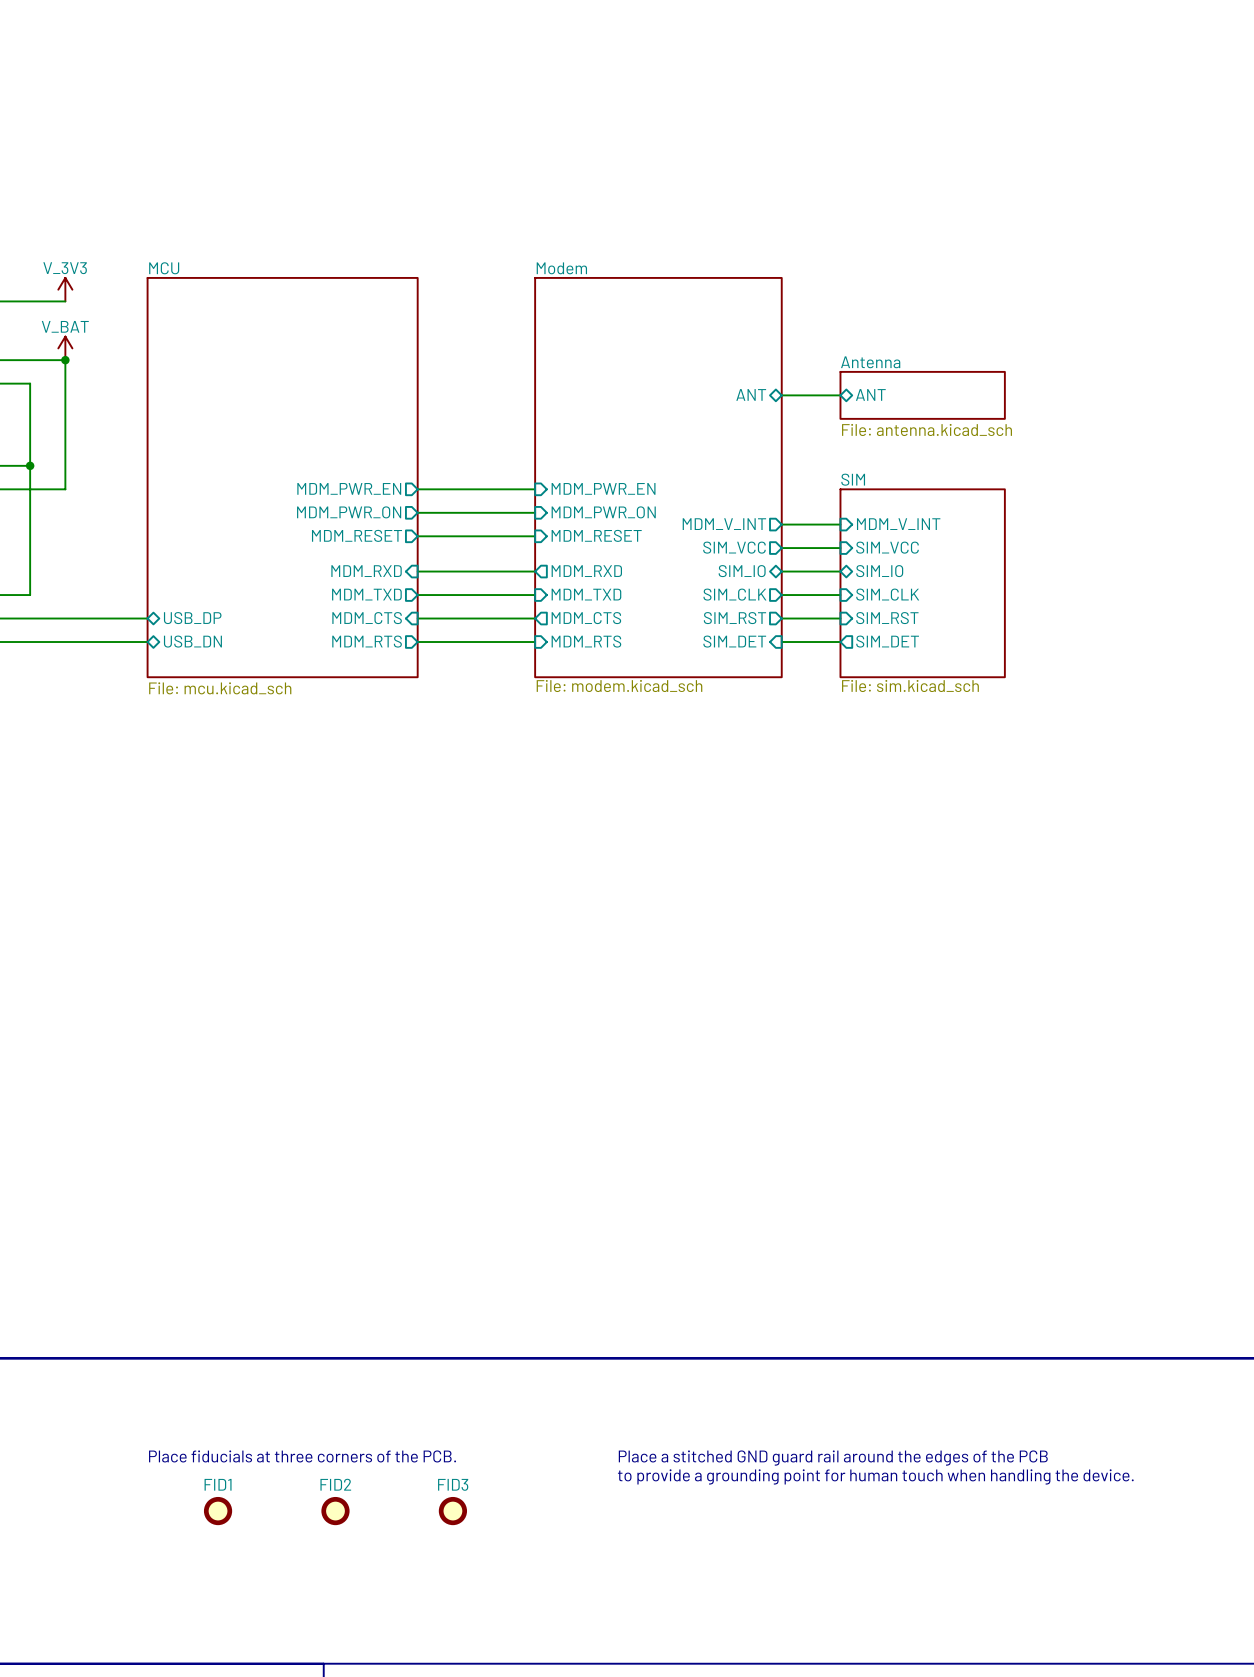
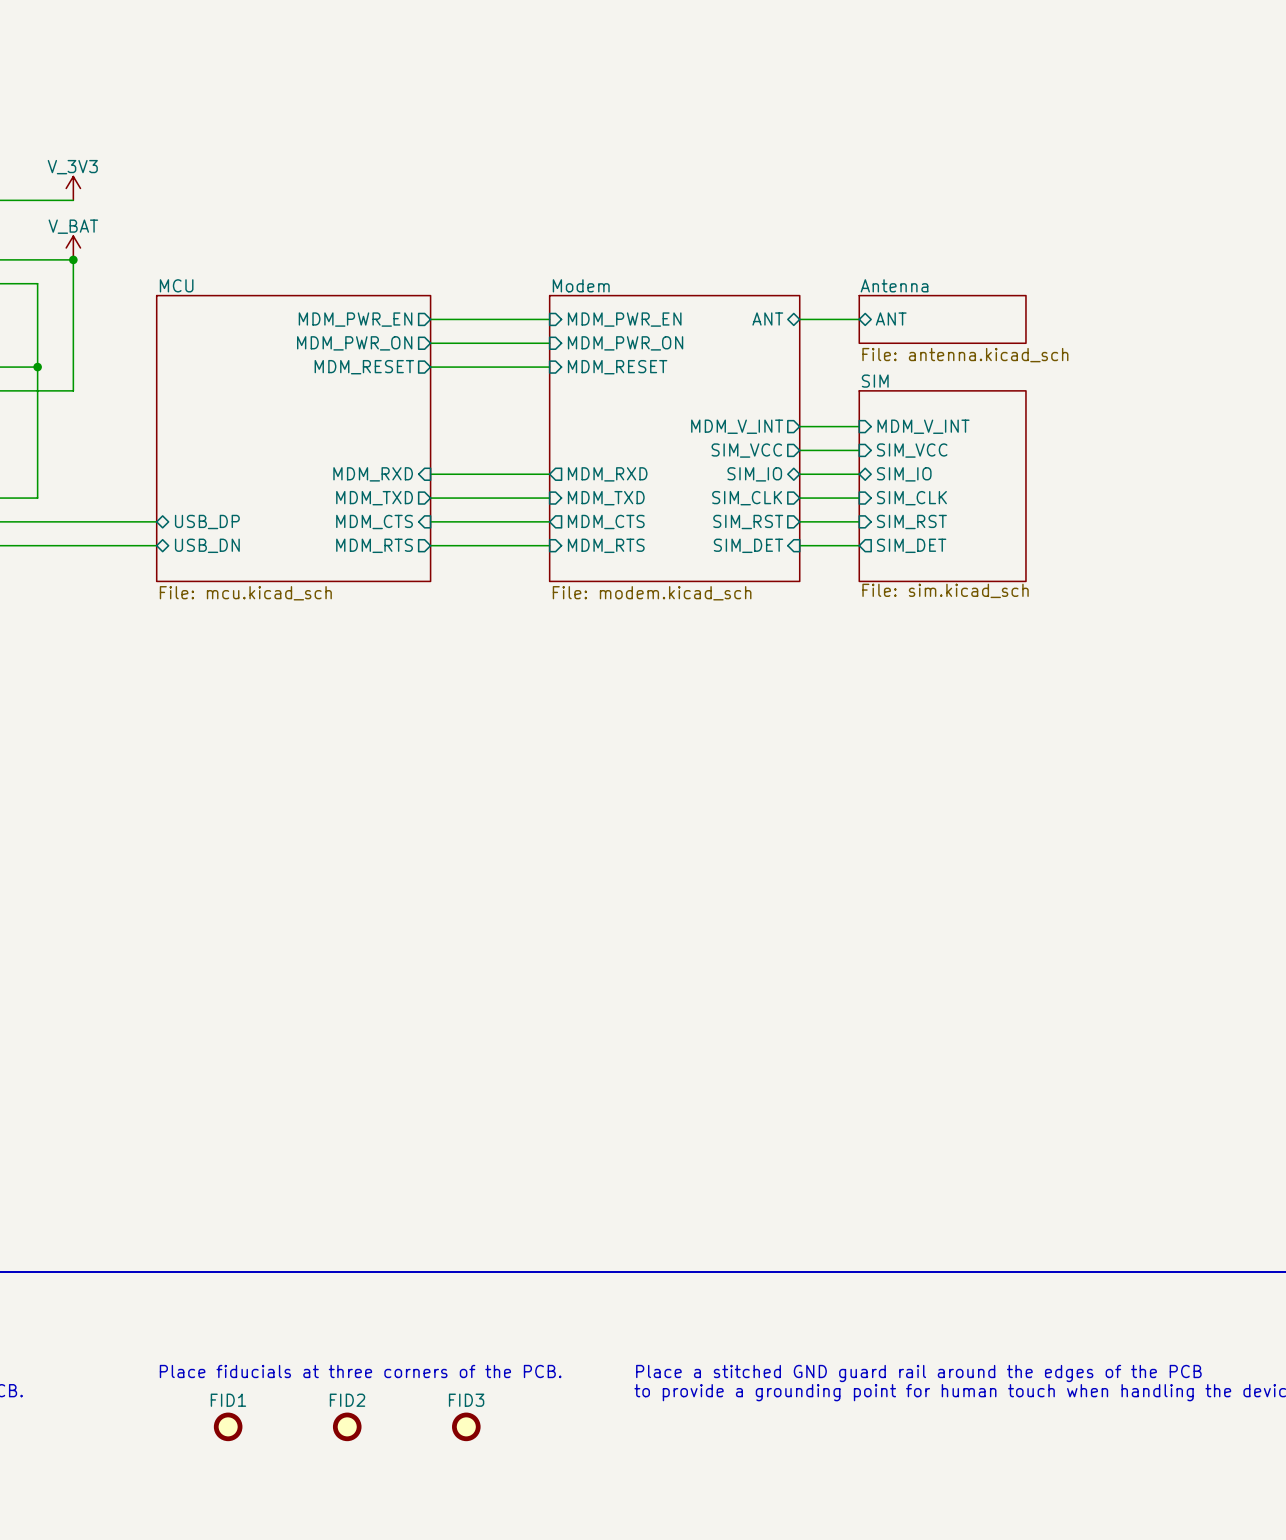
sheet pin position: ANT (751, 394) -> ANT (767, 318)
sheet pin position: ANT (870, 394) -> ANT (891, 318)
wire: (781, 395) (840, 395) -> (799, 319) (859, 319)
sheet Antenna position: (922, 395) -> (942, 319)
sheet MCU: File: mcu.kicad_sch (282, 477) -> none
sheet Modem: File: modem.kicad_sch (658, 477) -> none
sheet pin position: MDM_PWR_EN (349, 488) -> MDM_PWR_EN (355, 319)
sheet pin position: MDM_PWR_EN (603, 488) -> MDM_PWR_EN (624, 319)
wire: (417, 489) (535, 489) -> (430, 319) (549, 319)
sheet pin position: MDM_PWR_ON (349, 512) -> MDM_PWR_ON (354, 343)
wire: (417, 512) (535, 512) -> (430, 343) (549, 343)
sheet pin position: MDM_PWR_ON (603, 512) -> MDM_PWR_ON (625, 343)
sheet pin position: MDM_RESET (357, 535) -> MDM_RESET (364, 367)
sheet pin position: MDM_RESET (596, 535) -> MDM_RESET (617, 367)
sheet MCU: none -> File: mcu.kicad_sch (293, 438)
wire: (417, 536) (535, 536) -> (430, 367) (549, 367)
sheet Modem: none -> File: modem.kicad_sch (674, 438)

